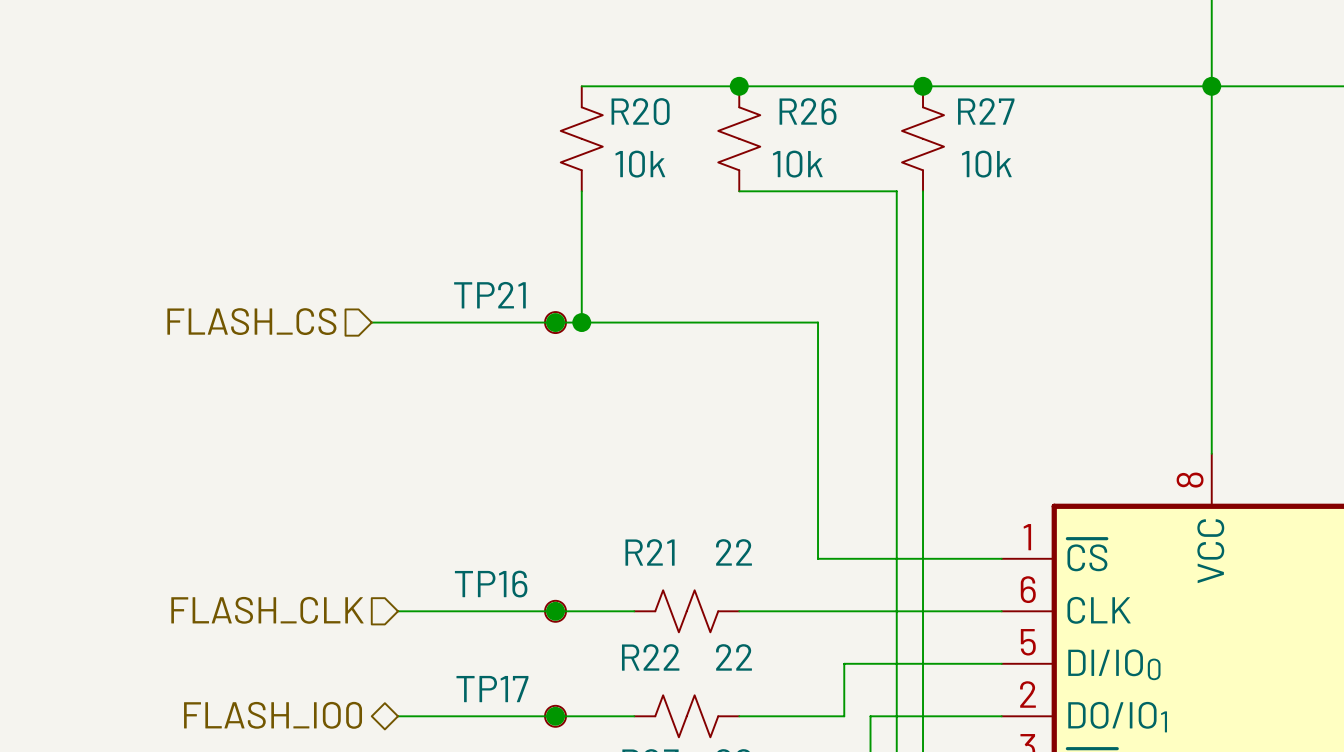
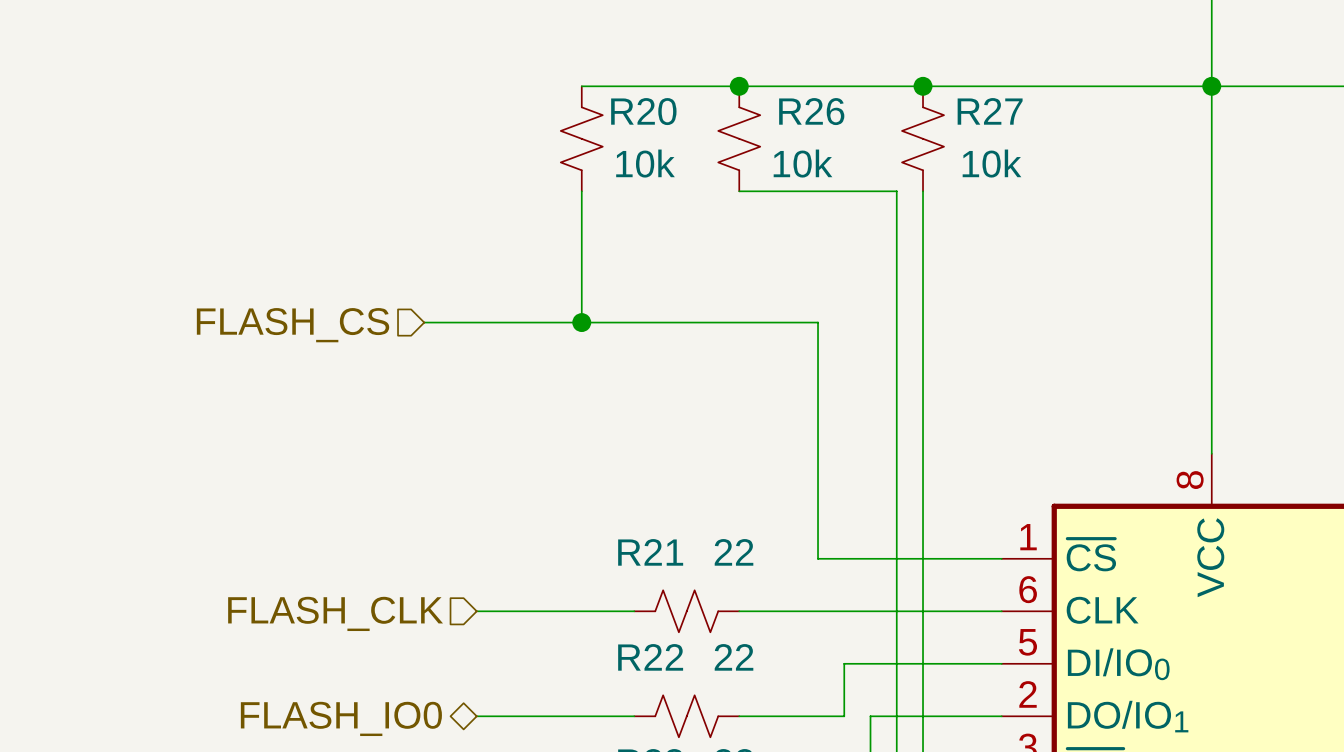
hierarchical label position: FLASH_CS (251, 321) -> FLASH_CS (293, 325)
wire: (371, 322) (424, 322) -> none
junction: (555, 322) -> none
TP21: (555, 322) -> none
hierarchical label position: FLASH_CLK (267, 610) -> FLASH_CLK (335, 613)
wire: (398, 611) (476, 611) -> none
junction: (555, 611) -> none
TP16: (555, 611) -> none
hierarchical label position: FLASH_IO0 (273, 715) -> FLASH_IO0 (341, 718)
wire: (398, 716) (476, 716) -> none
junction: (555, 716) -> none
TP17: (555, 716) -> none

